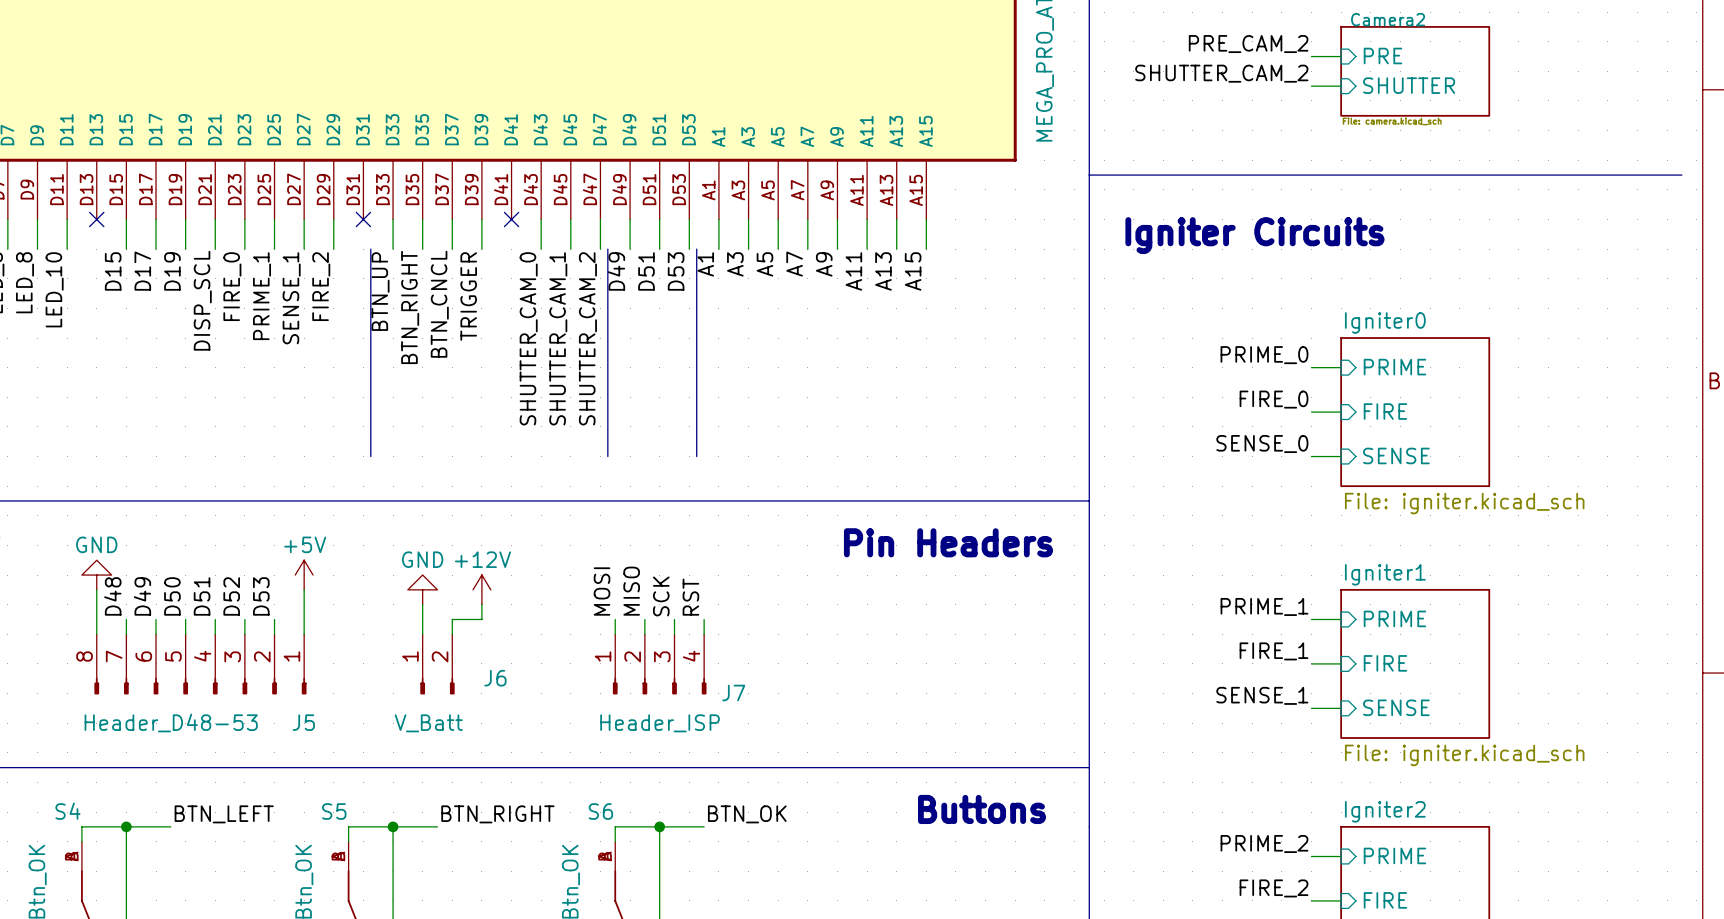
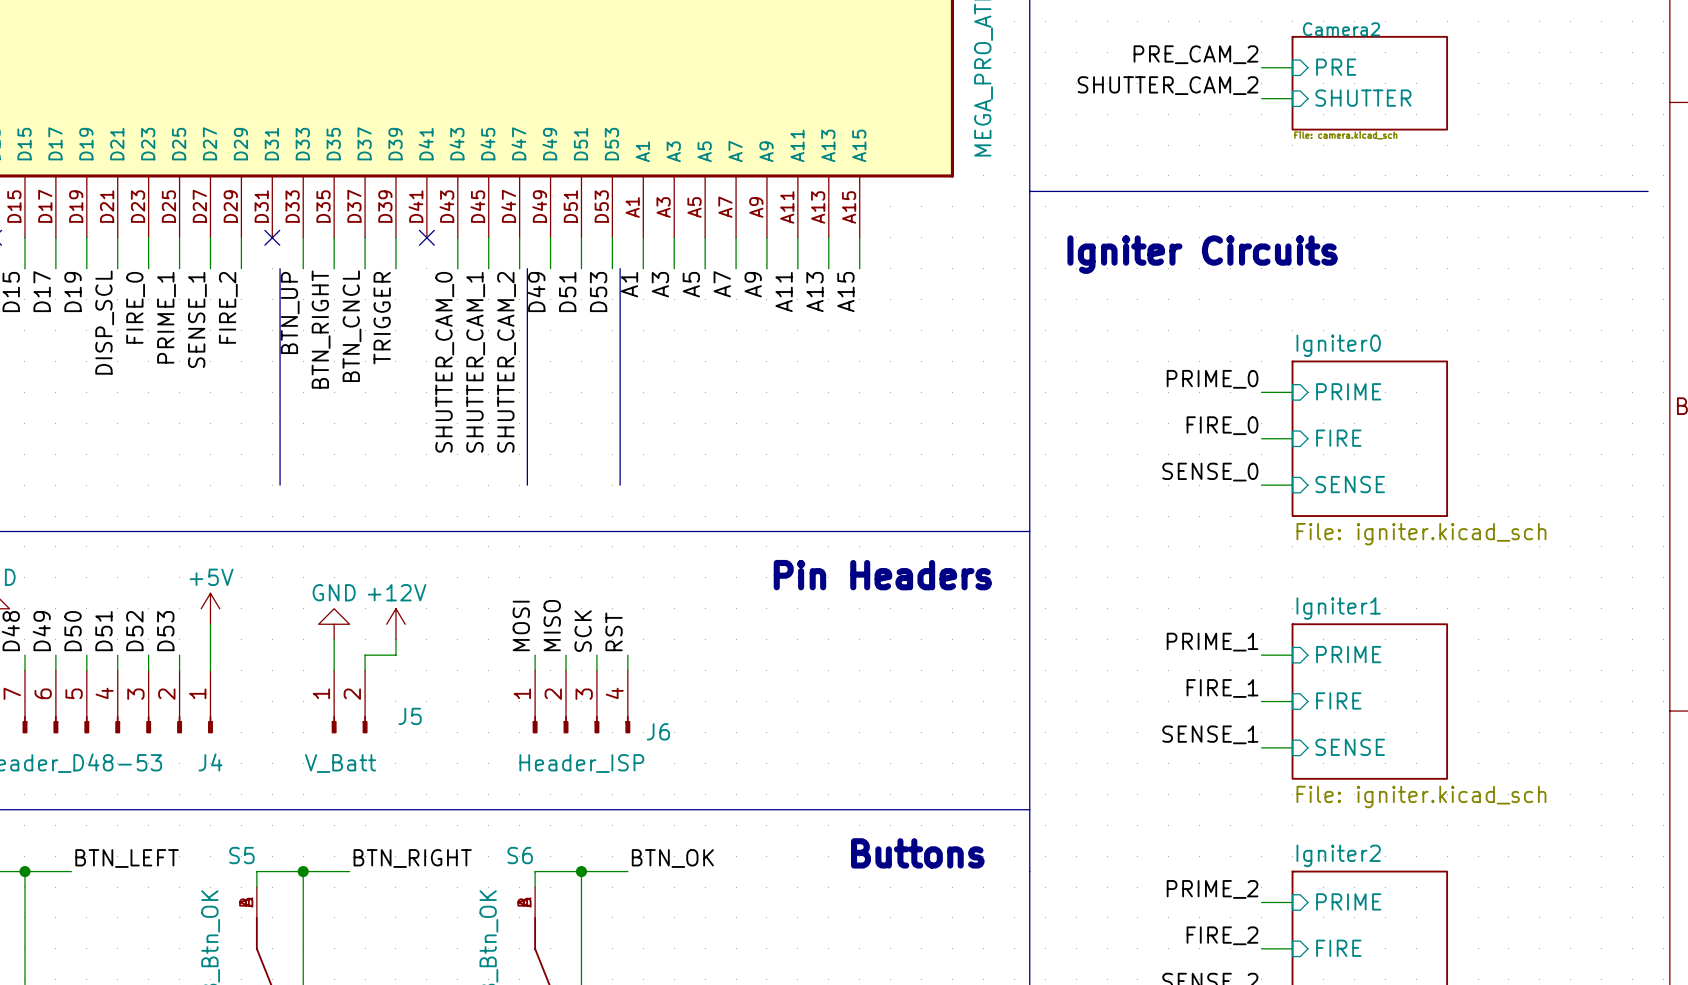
J6 name: J6 (495, 678) -> J5 (410, 716)
J7 name: J7 (733, 693) -> J6 (658, 731)
J5 name: J5 (303, 722) -> J4 (210, 762)

